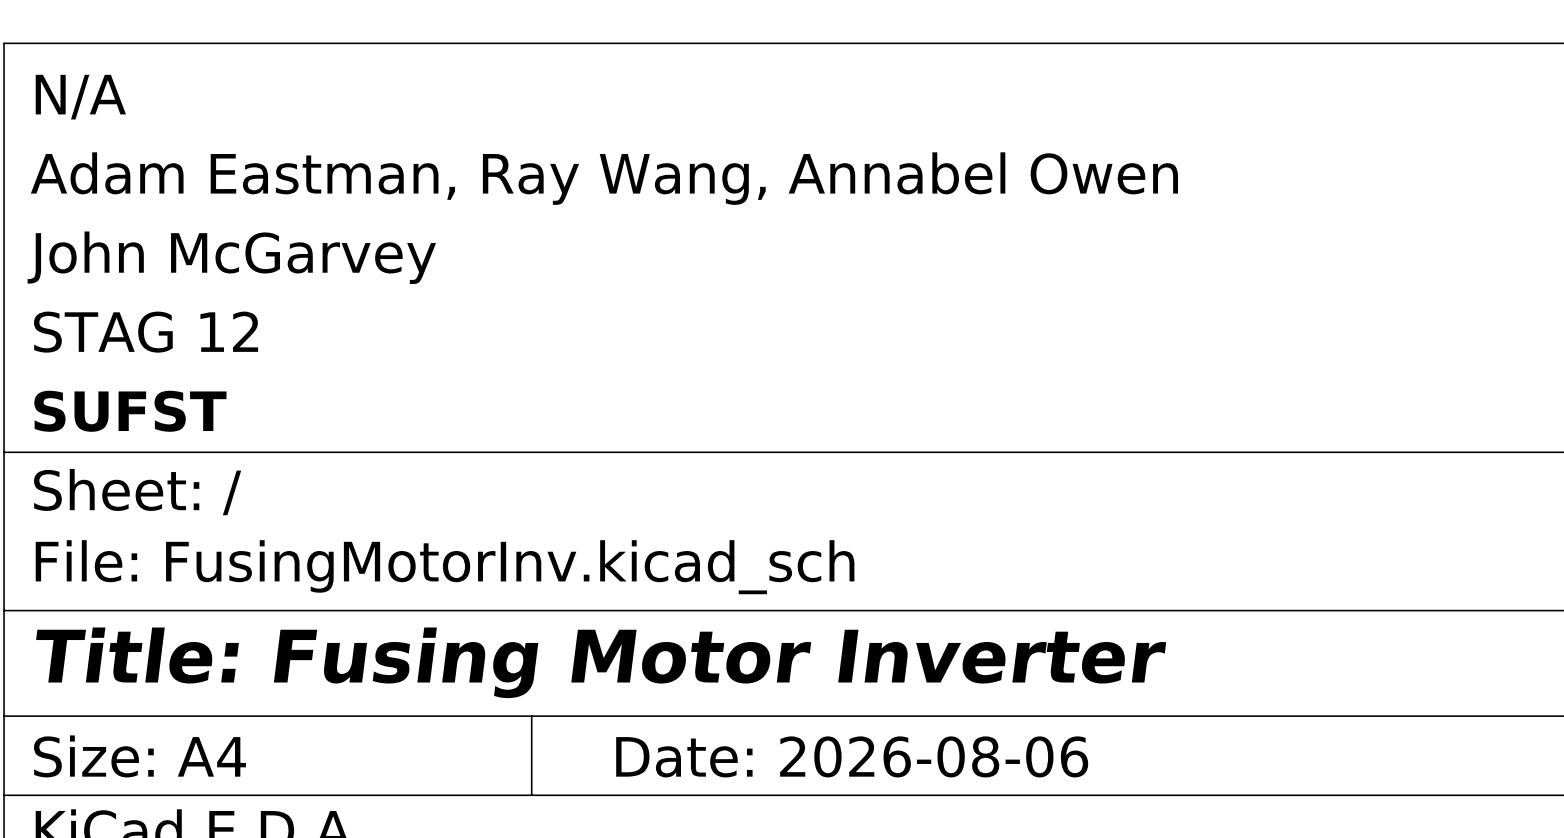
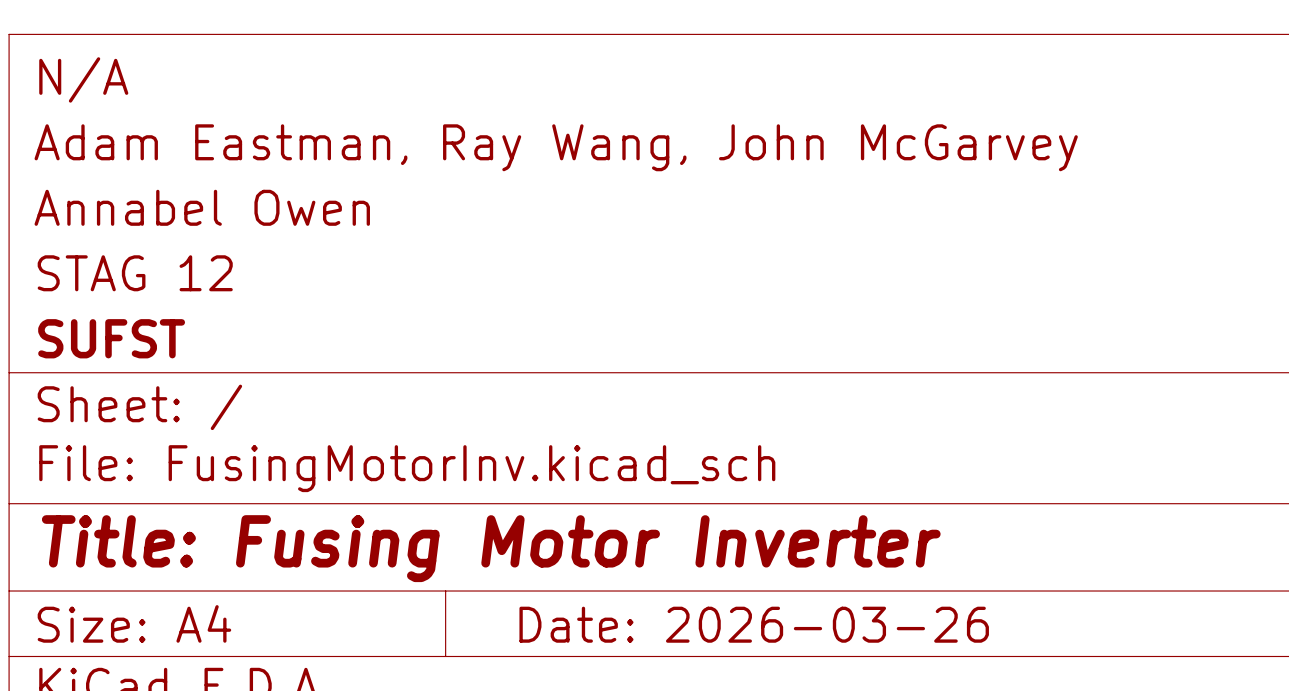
title block: Adam Eastman, Ray Wang, Annabel Owen (604, 178) -> Adam Eastman, Ray Wang, John McGarvey (556, 147)
title block: John McGarvey (231, 257) -> Annabel Owen (202, 207)
title block: Date: 2026-08-06 (852, 756) -> Date: 2026-03-26 (754, 624)

